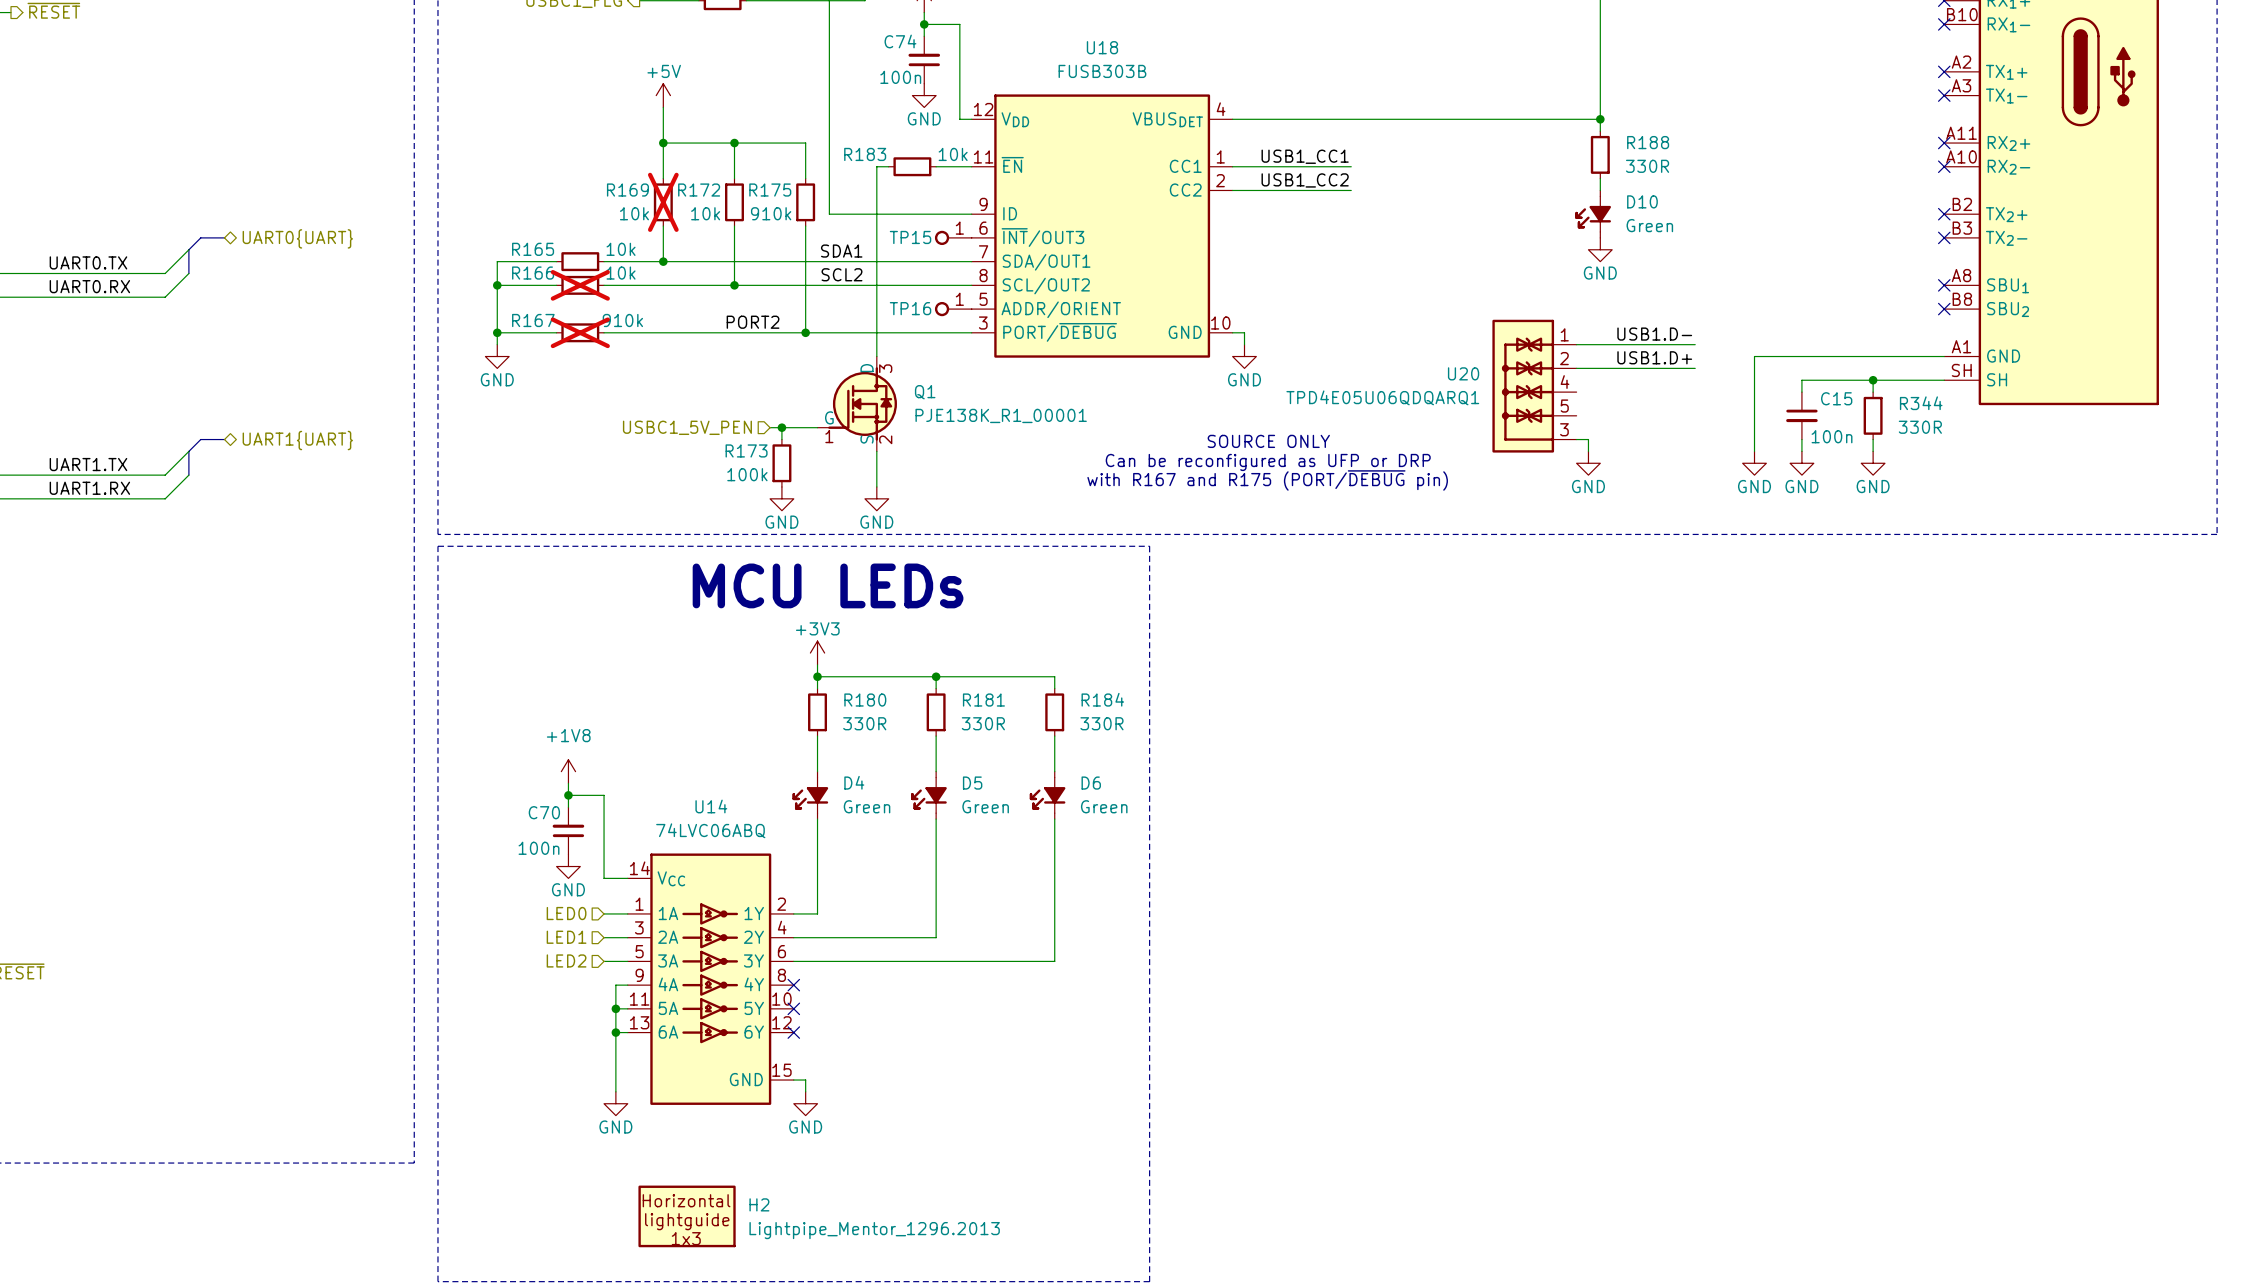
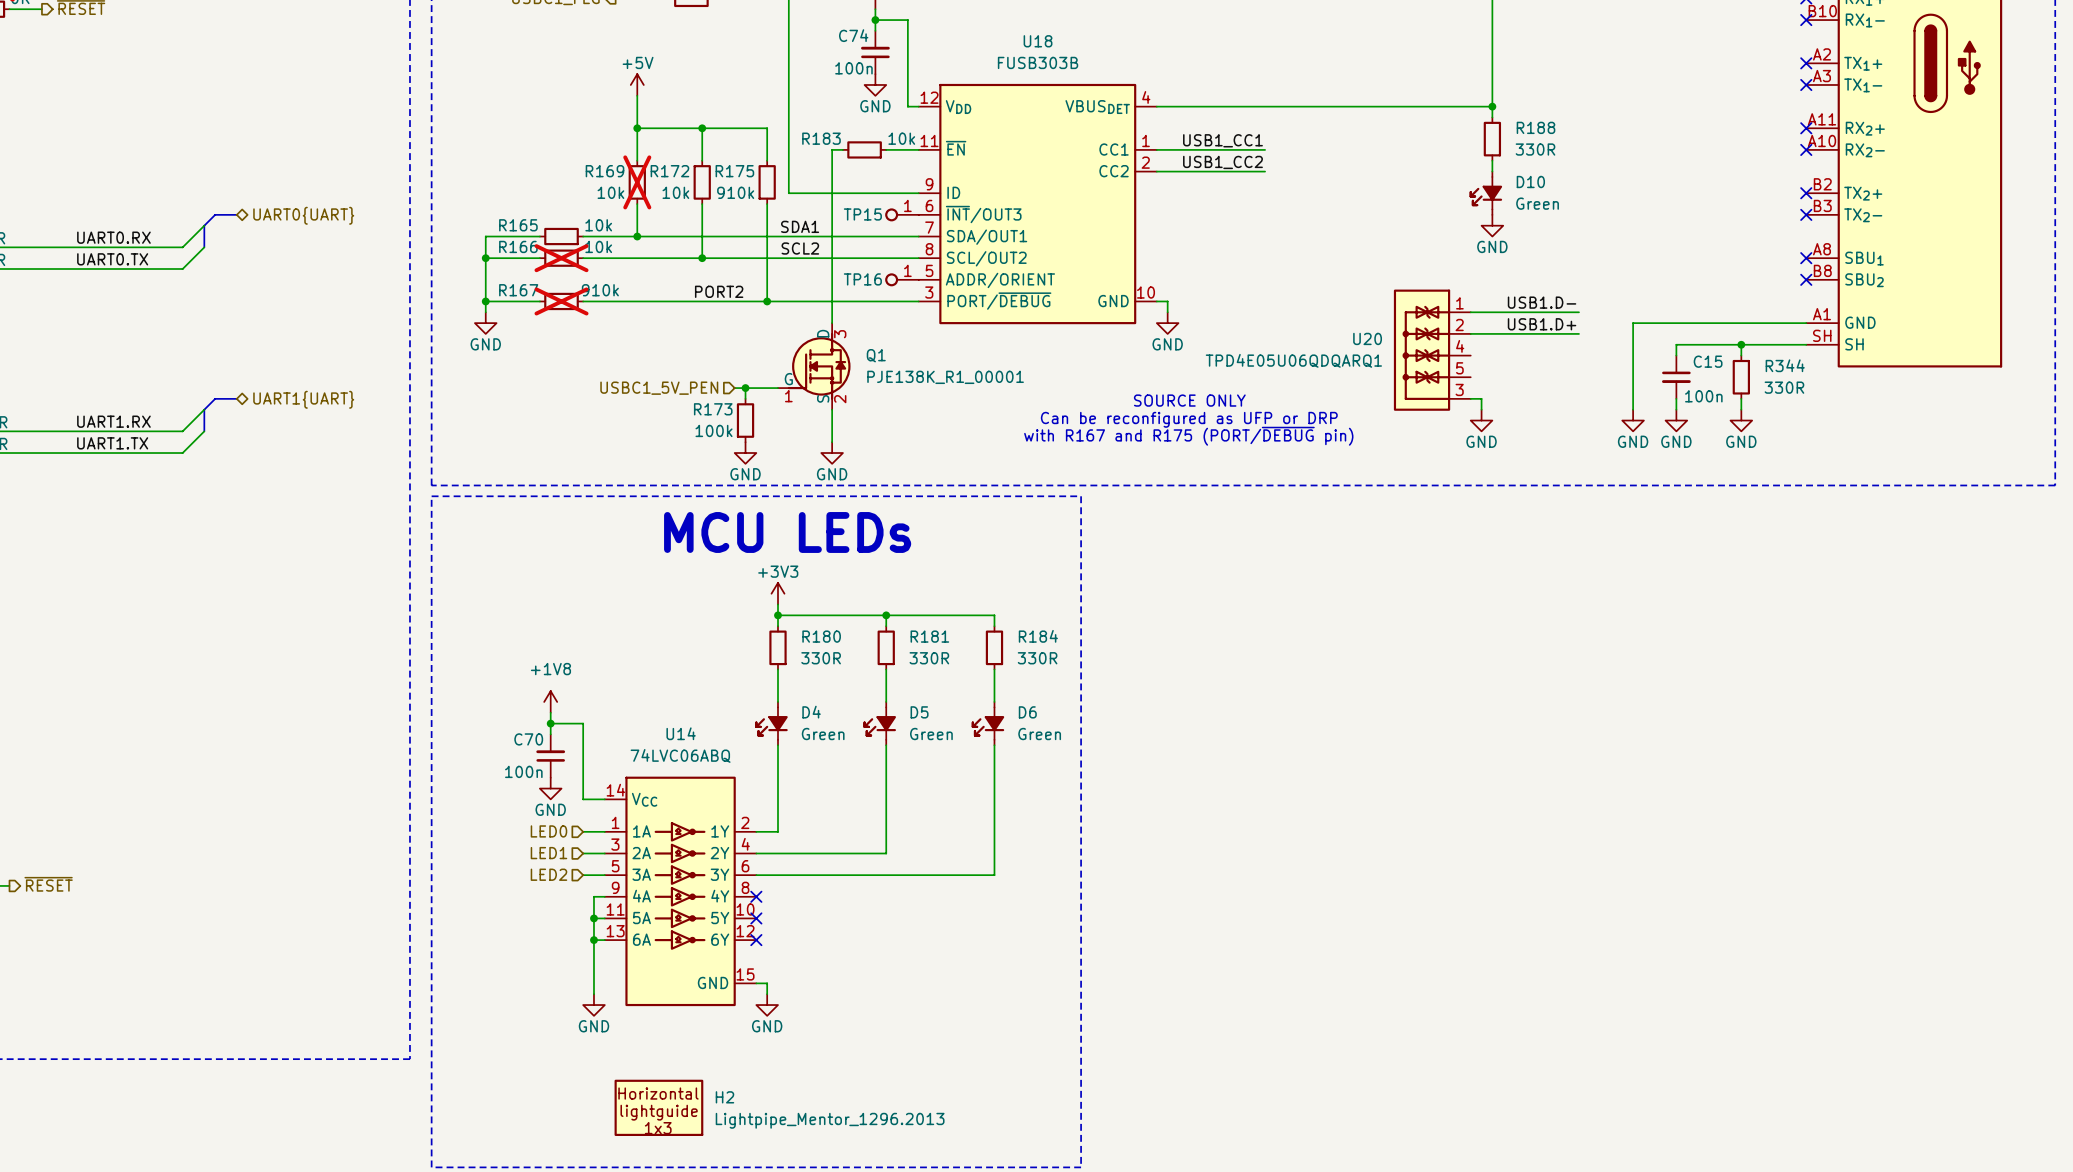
label: UART0.TX (88, 262) -> UART0.RX (113, 237)
label: UART0.RX (89, 286) -> UART0.TX (112, 259)
label: UART1.TX (88, 464) -> UART1.RX (113, 421)
label: UART1.RX (89, 488) -> UART1.TX (112, 443)

